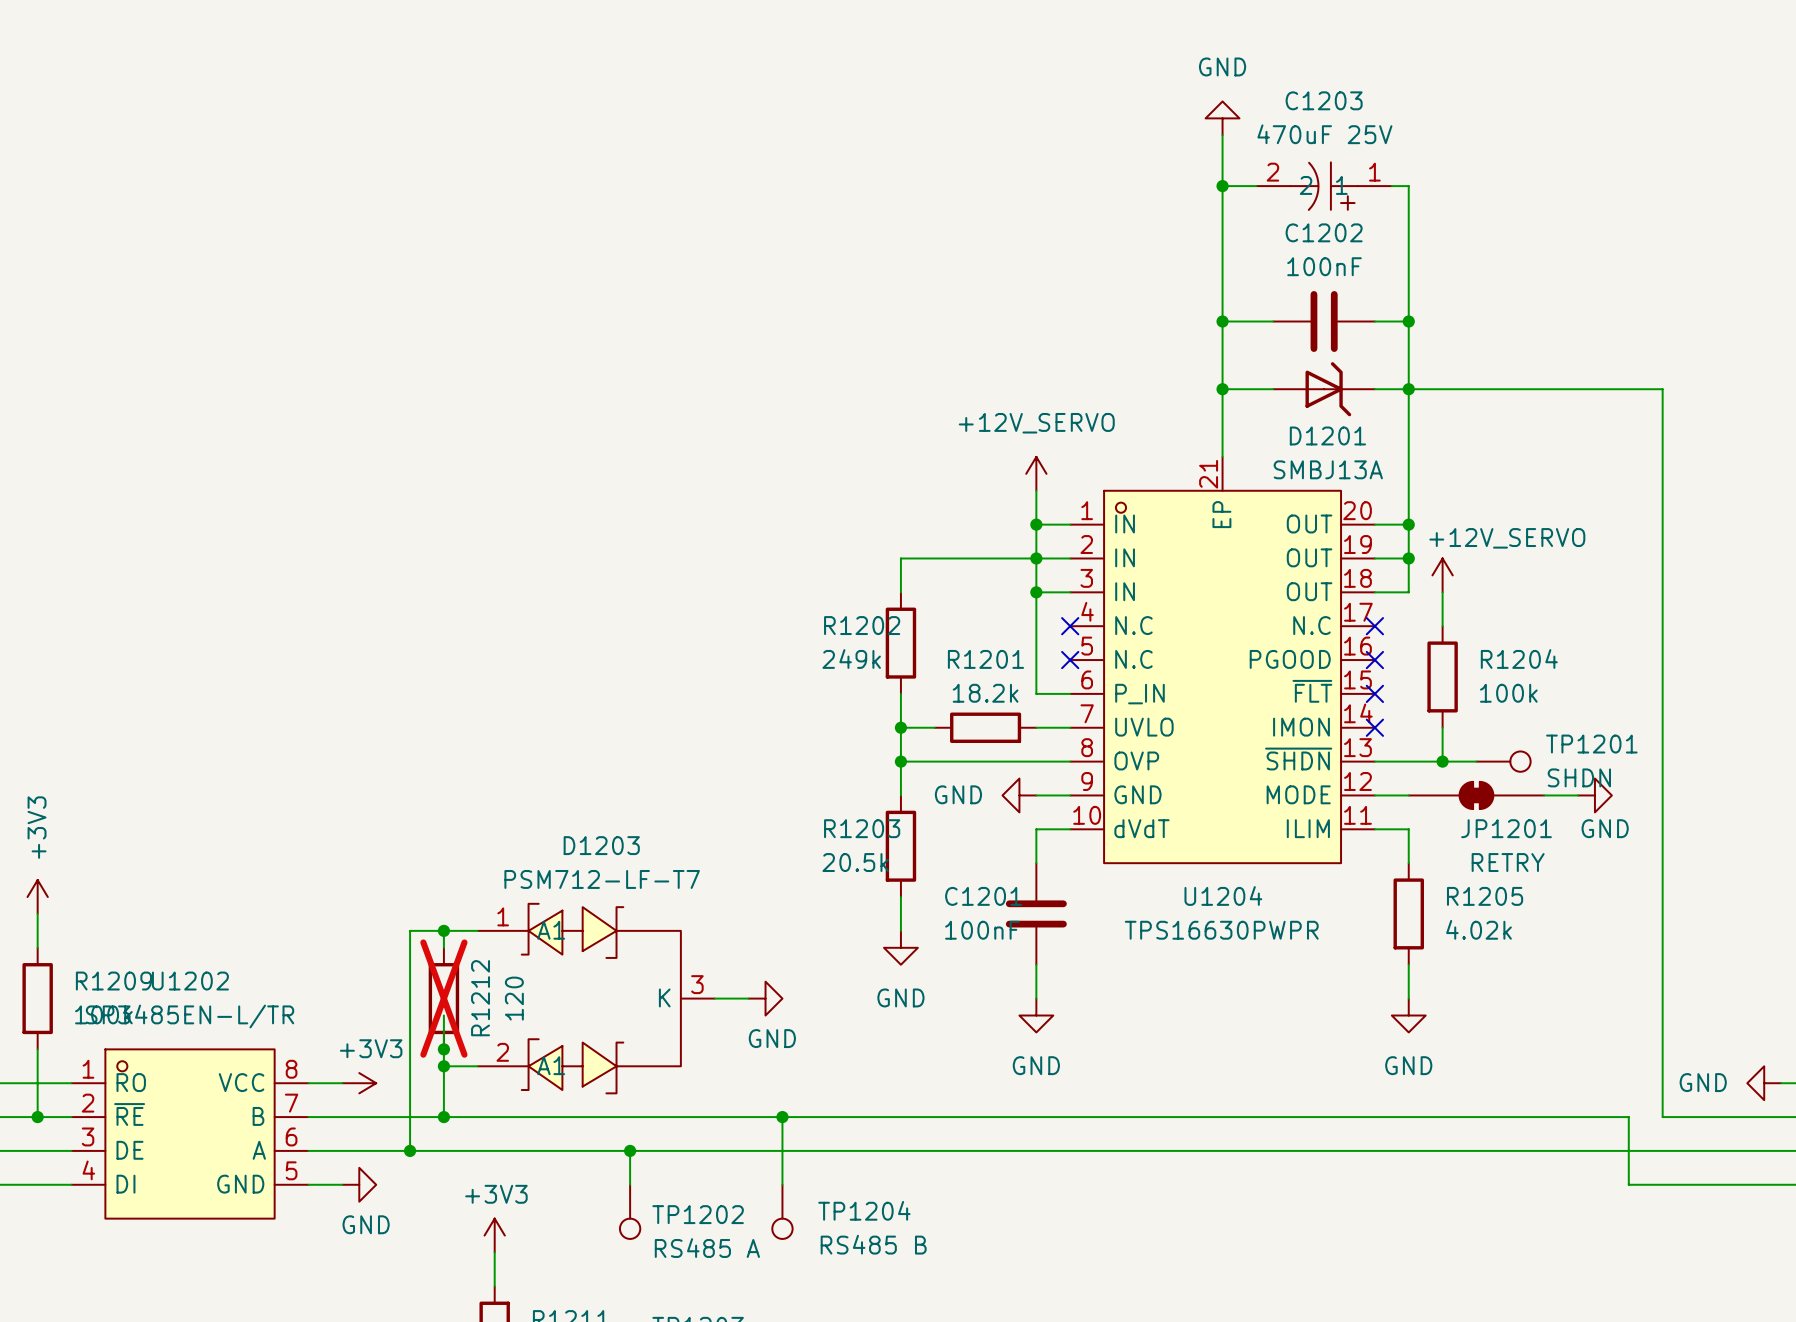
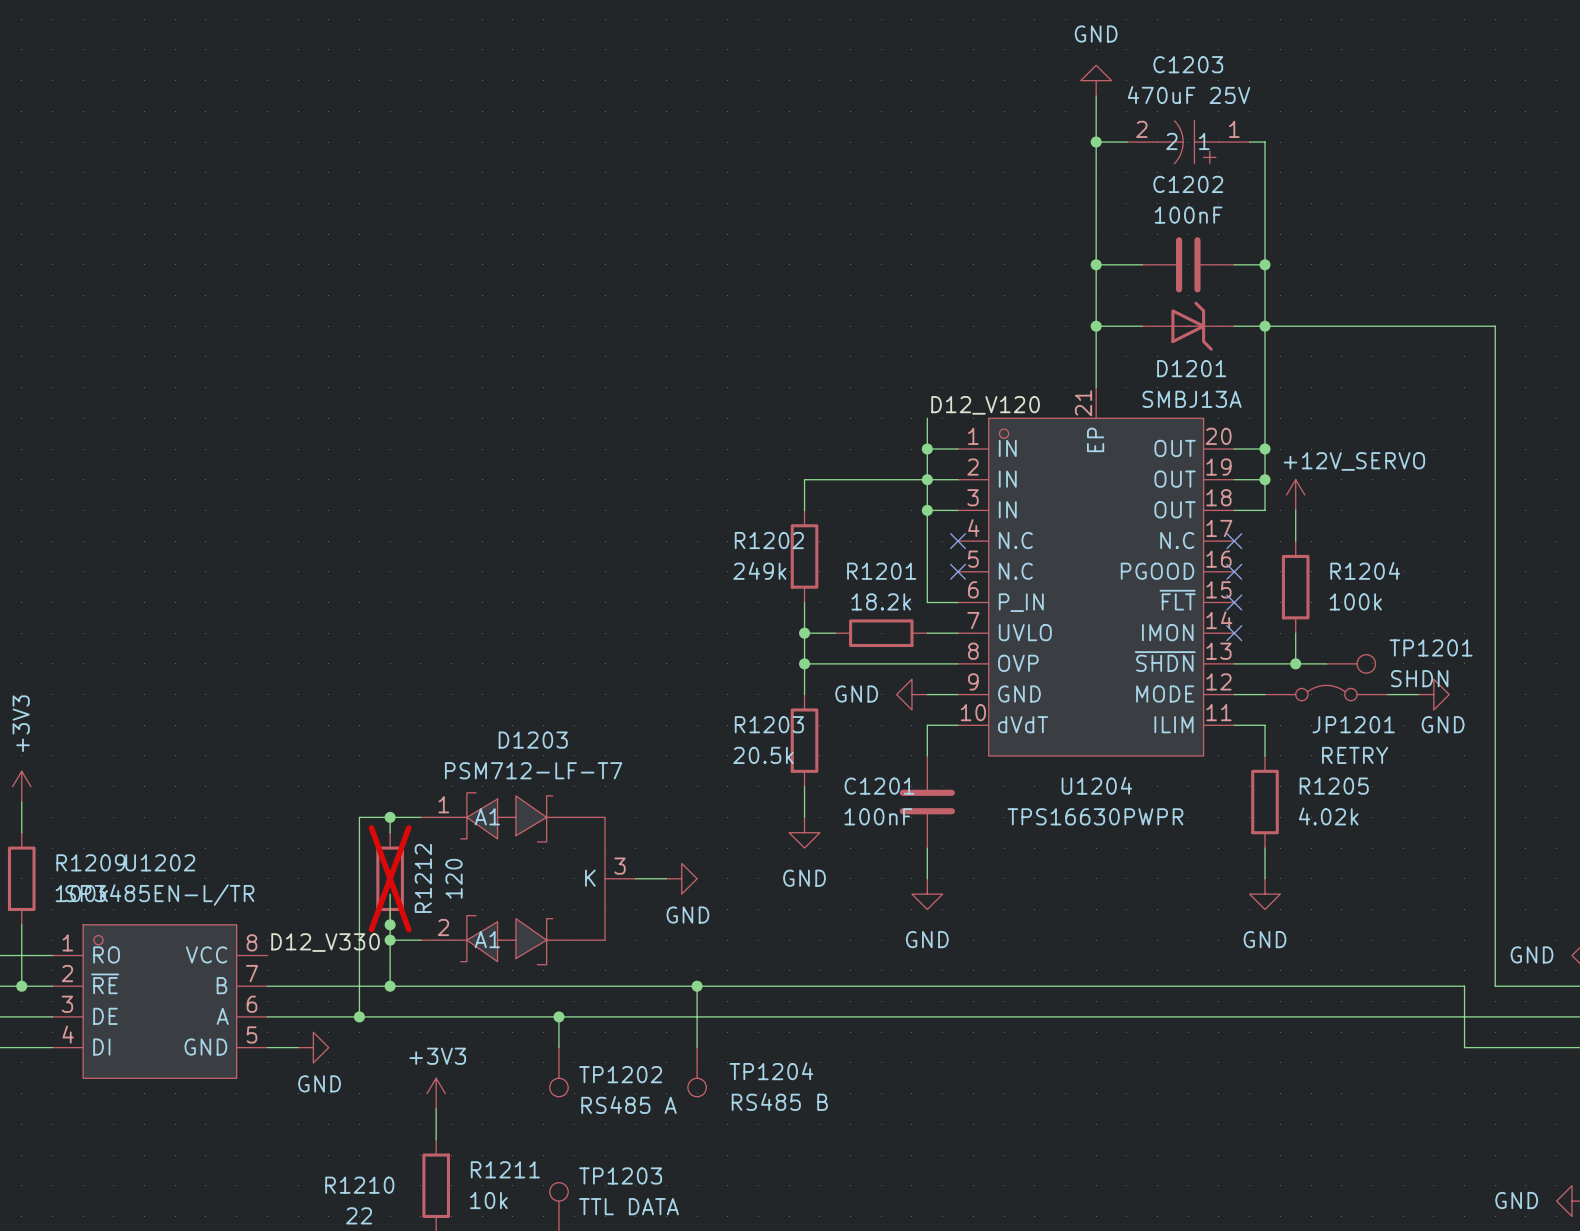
power symbol: +12V_SERVO (1036, 473) -> none
label: none -> D12_V120 (985, 405)
JP1201 symbol: [1408, 780, 1545, 811] -> [1265, 685, 1388, 701]
label: none -> D12_V330 (325, 942)
wire: (308, 1083) (342, 1083) -> none
power symbol: +3V3 (359, 1083) -> none

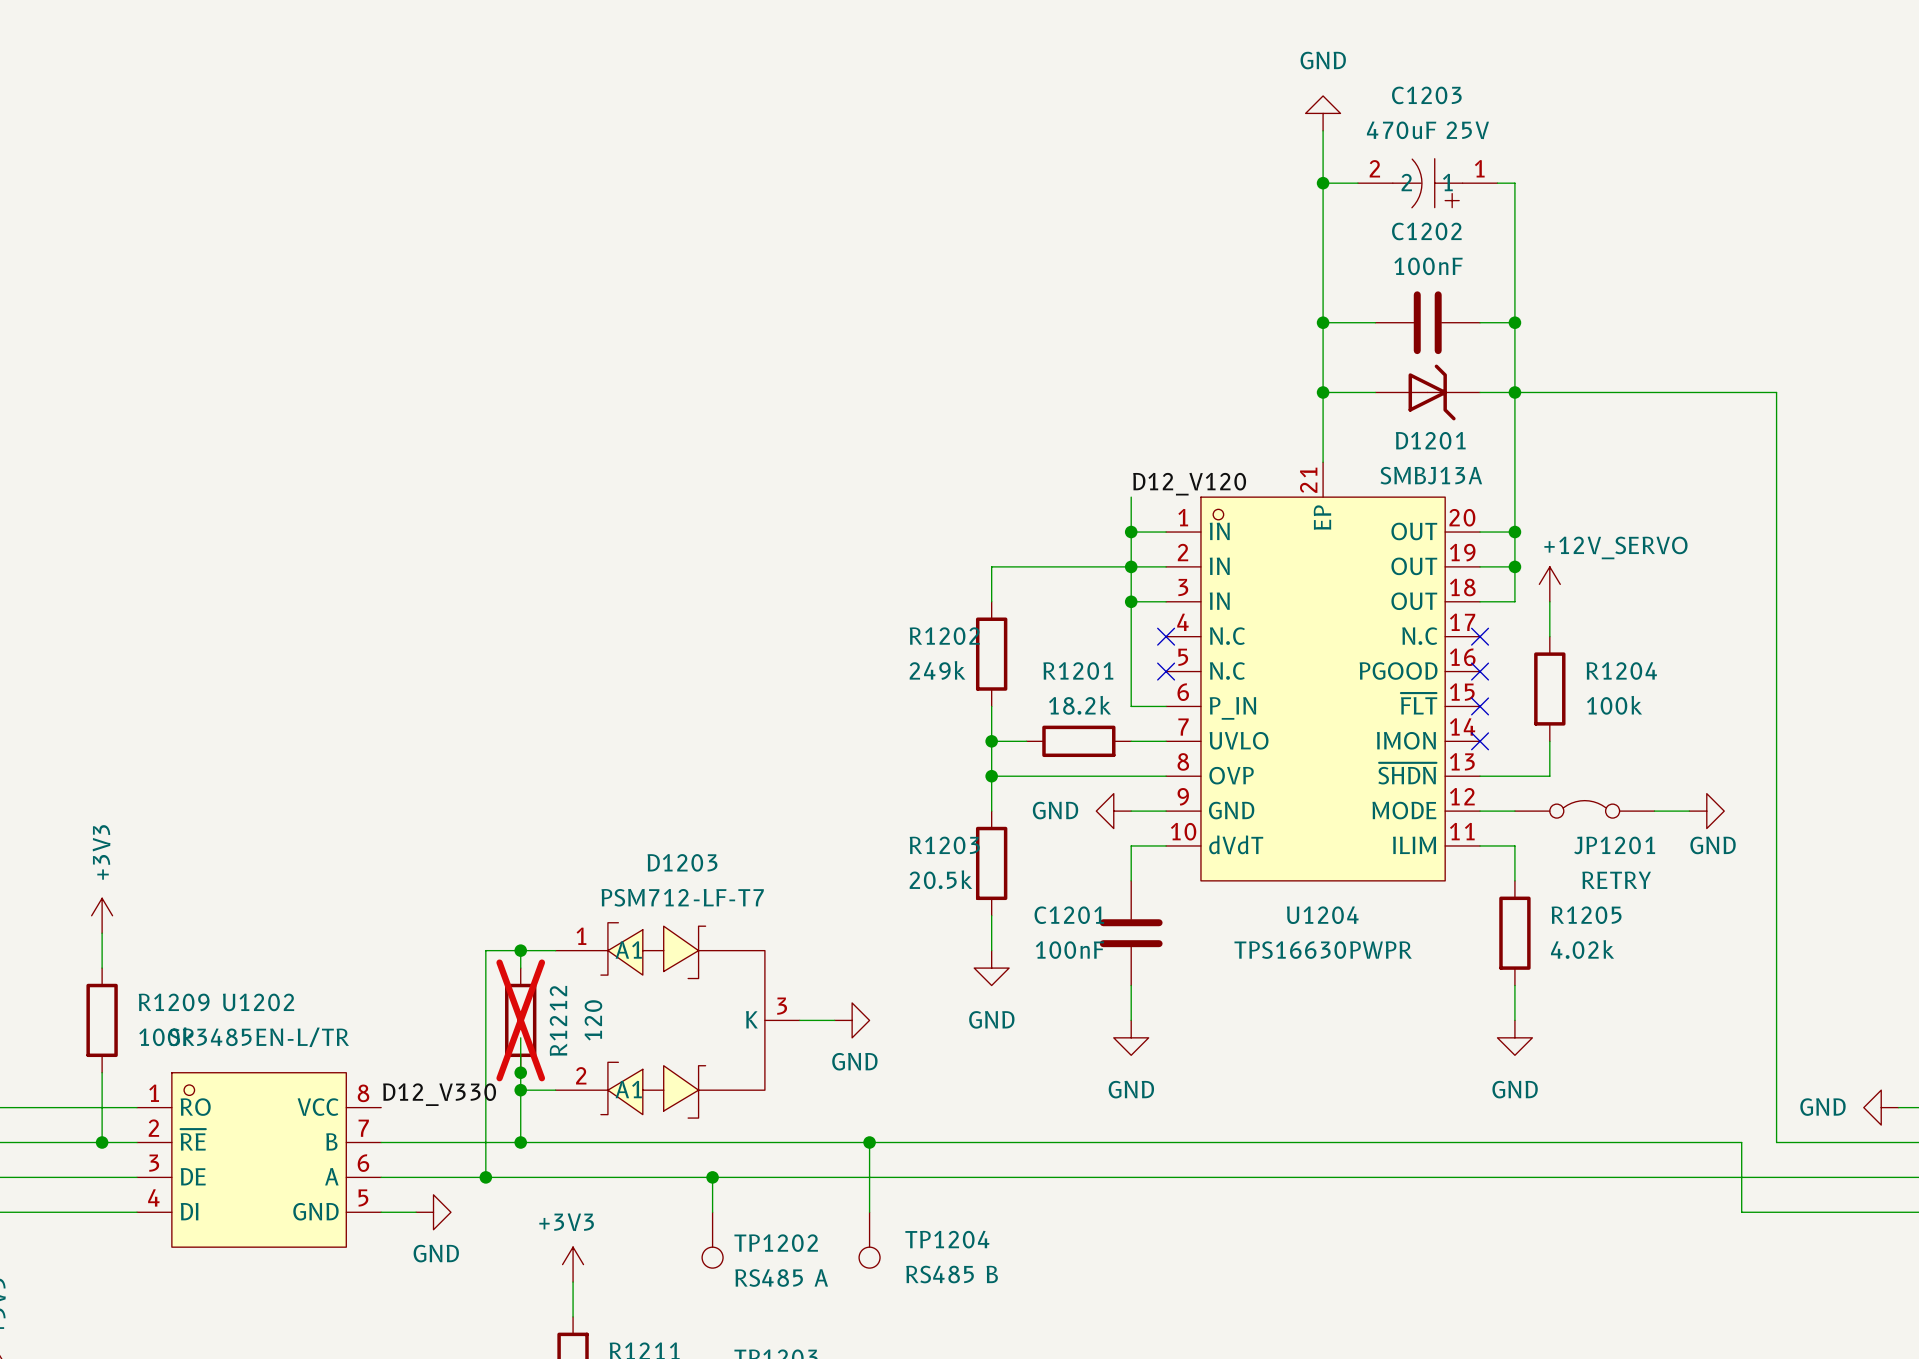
wire: (1295, 663) (1326, 663) -> none
junction: (1295, 663) -> none
TP1201: SHDN (1350, 663) -> none

